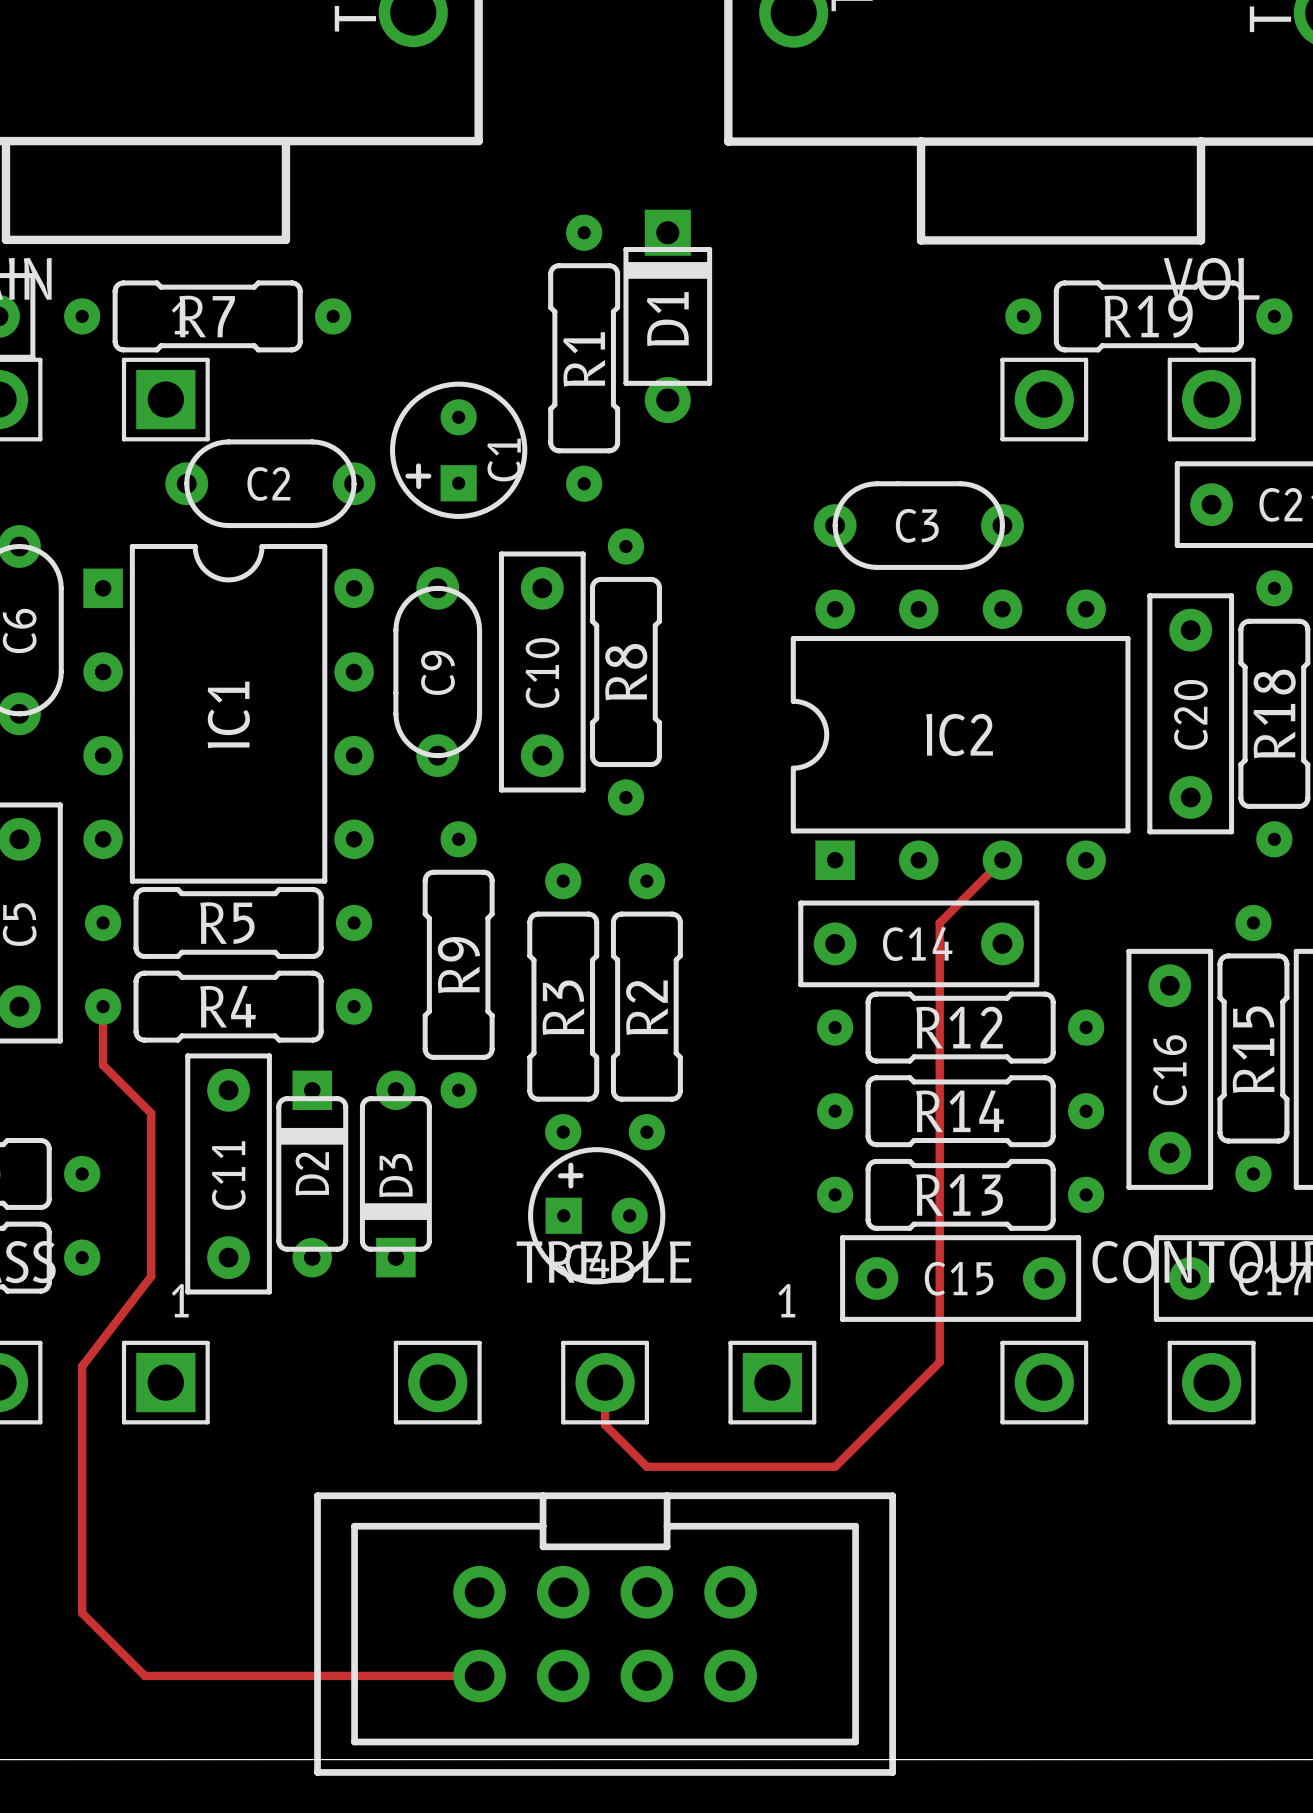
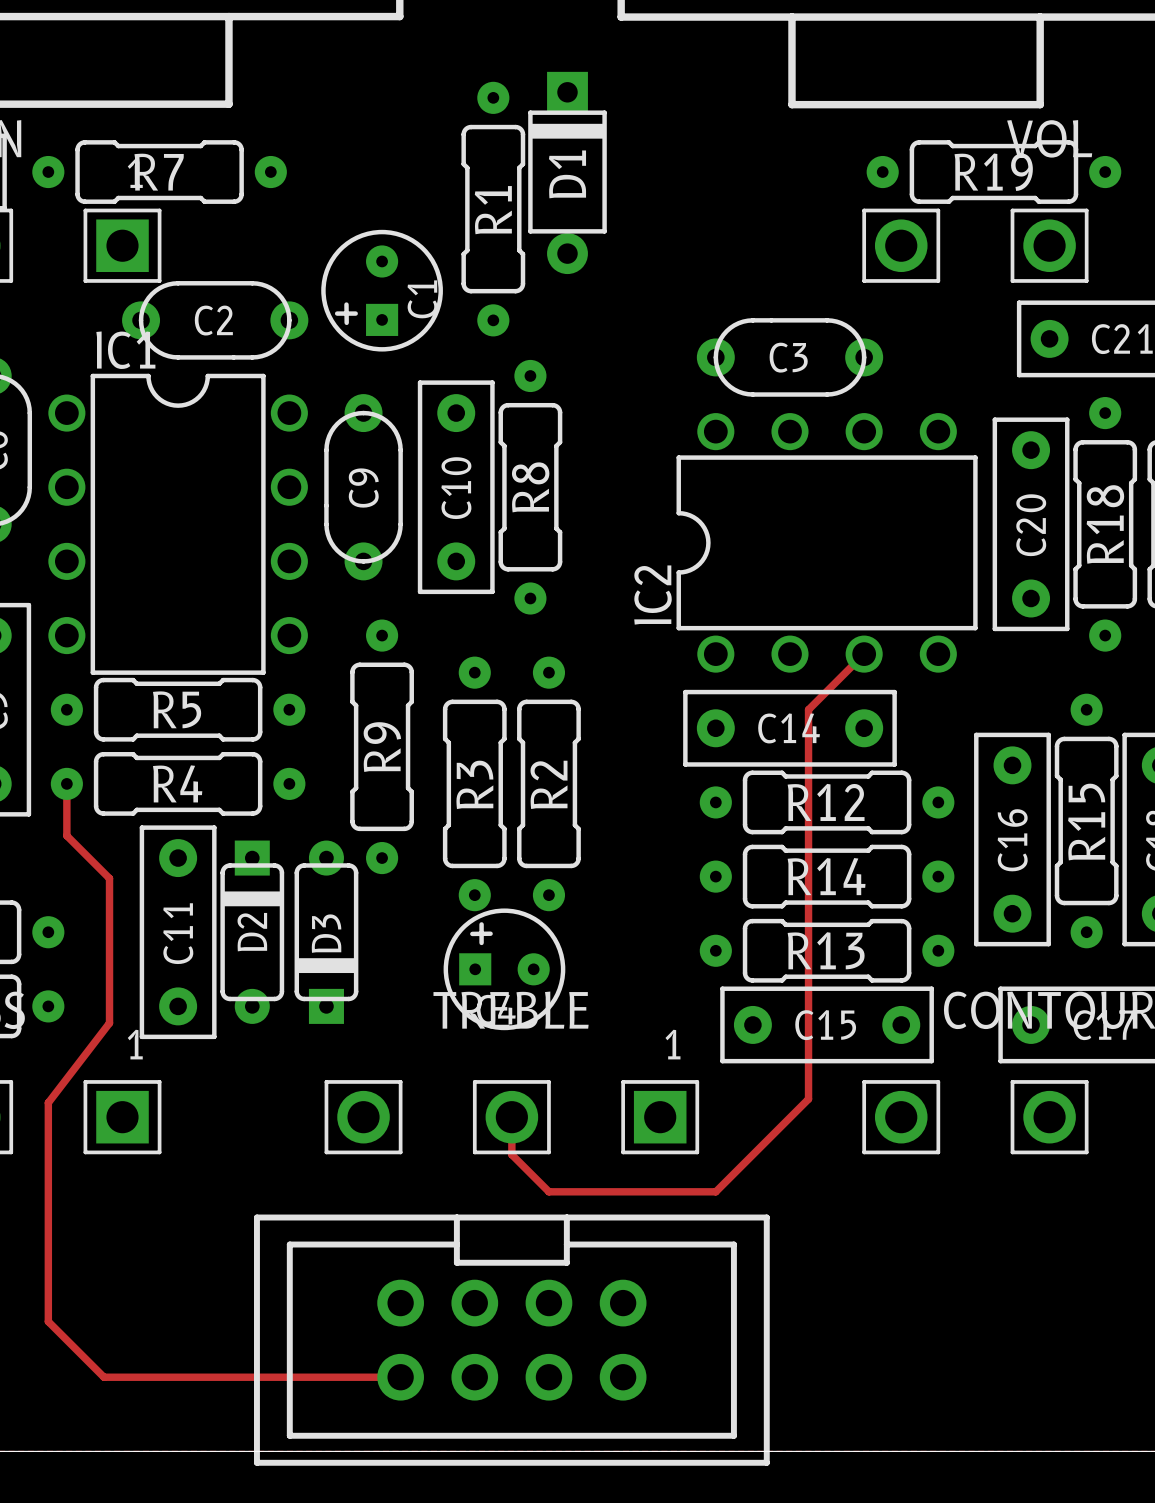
D1 footprint: [623, 209, 713, 424] -> [528, 71, 607, 275]
IC1 footprint: [83, 543, 374, 884] -> [48, 373, 308, 675]
IC2 footprint: [790, 589, 1131, 880] -> [676, 413, 978, 673]
IC1 name rotation: 0° (228, 714) -> 90° clockwise (125, 350)
IC1 name position: IC1 (228, 714) -> IC1 (125, 350)
IC2 name rotation: 0° (959, 734) -> 90° counterclockwise (652, 595)
IC2 name position: IC2 (959, 734) -> IC2 (652, 595)

